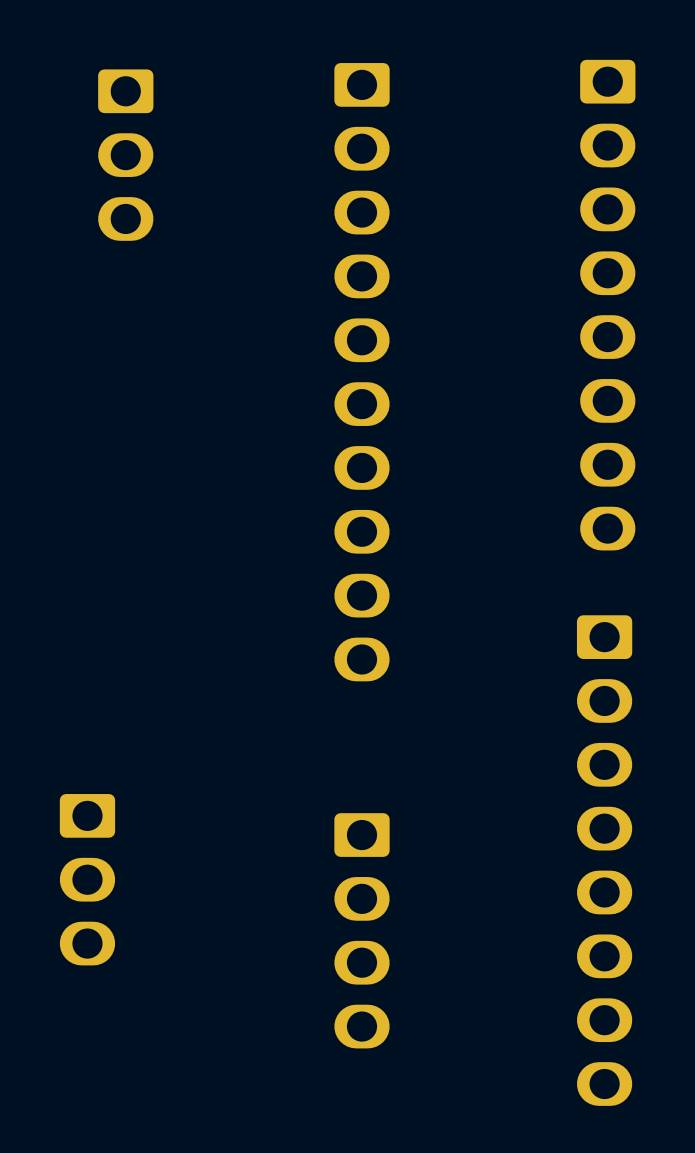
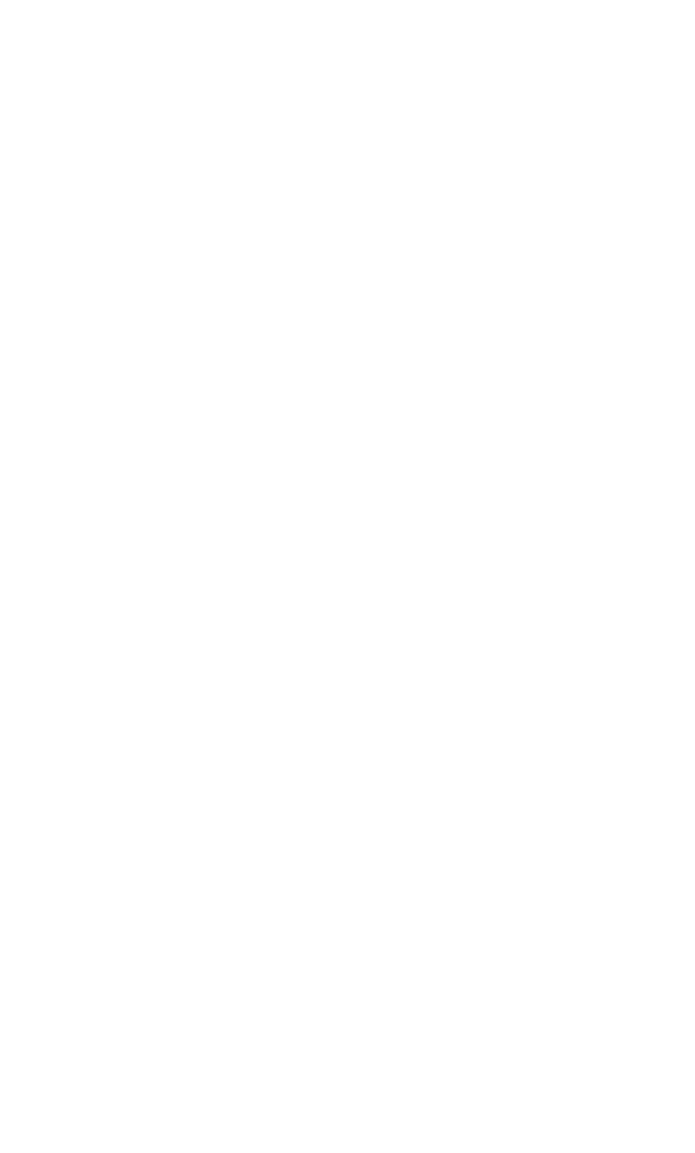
part: (125, 155) -> none
part: (607, 305) -> none
part: (362, 372) -> none
part: (604, 860) -> none
part: (87, 879) -> none
part: (362, 930) -> none

